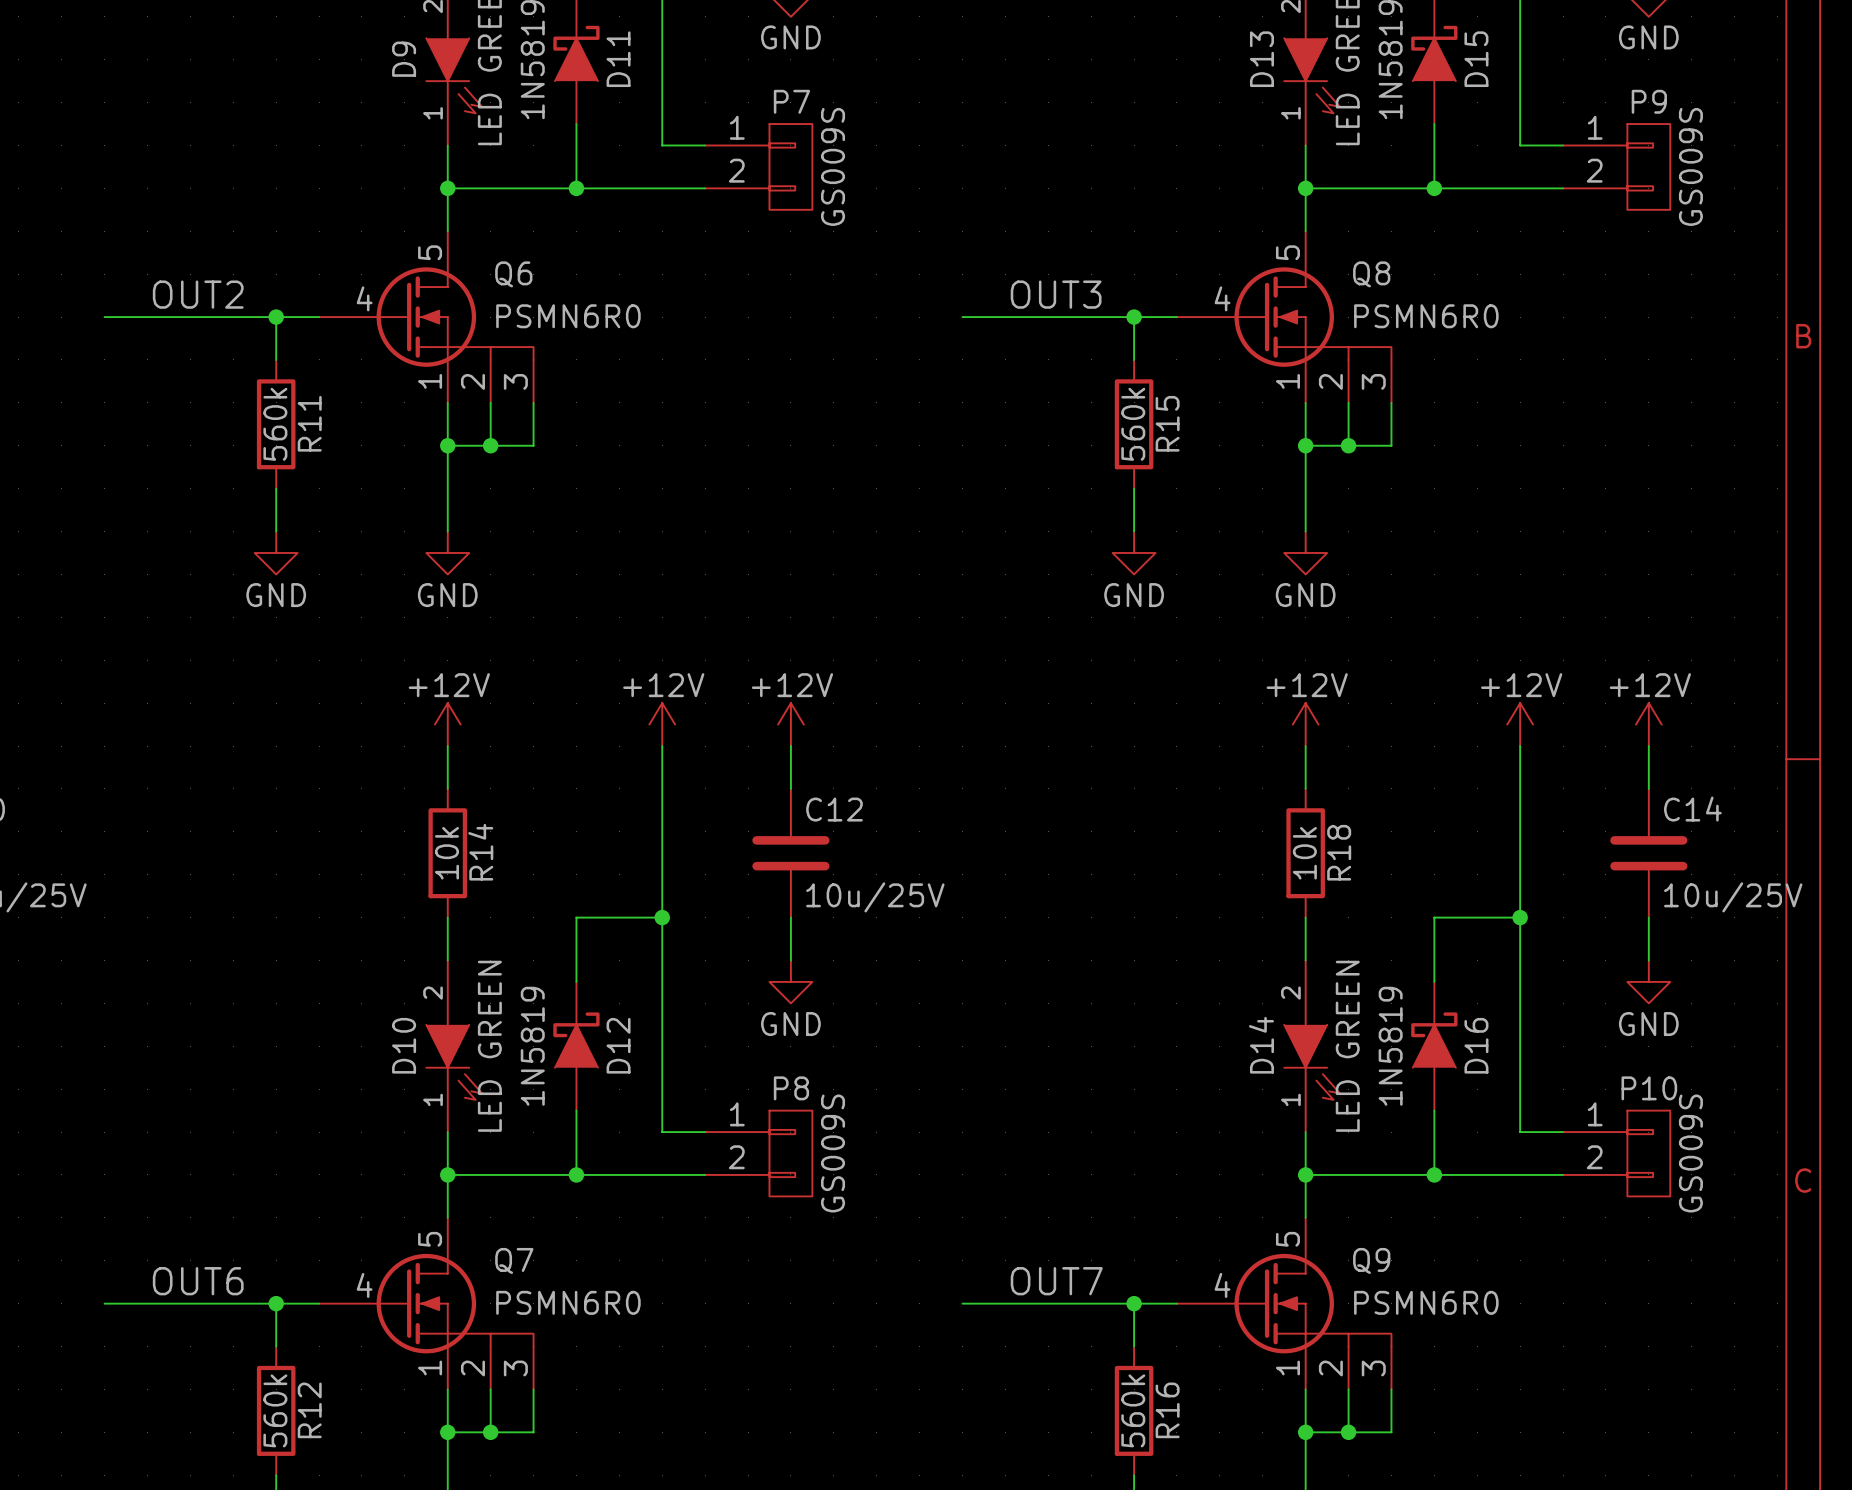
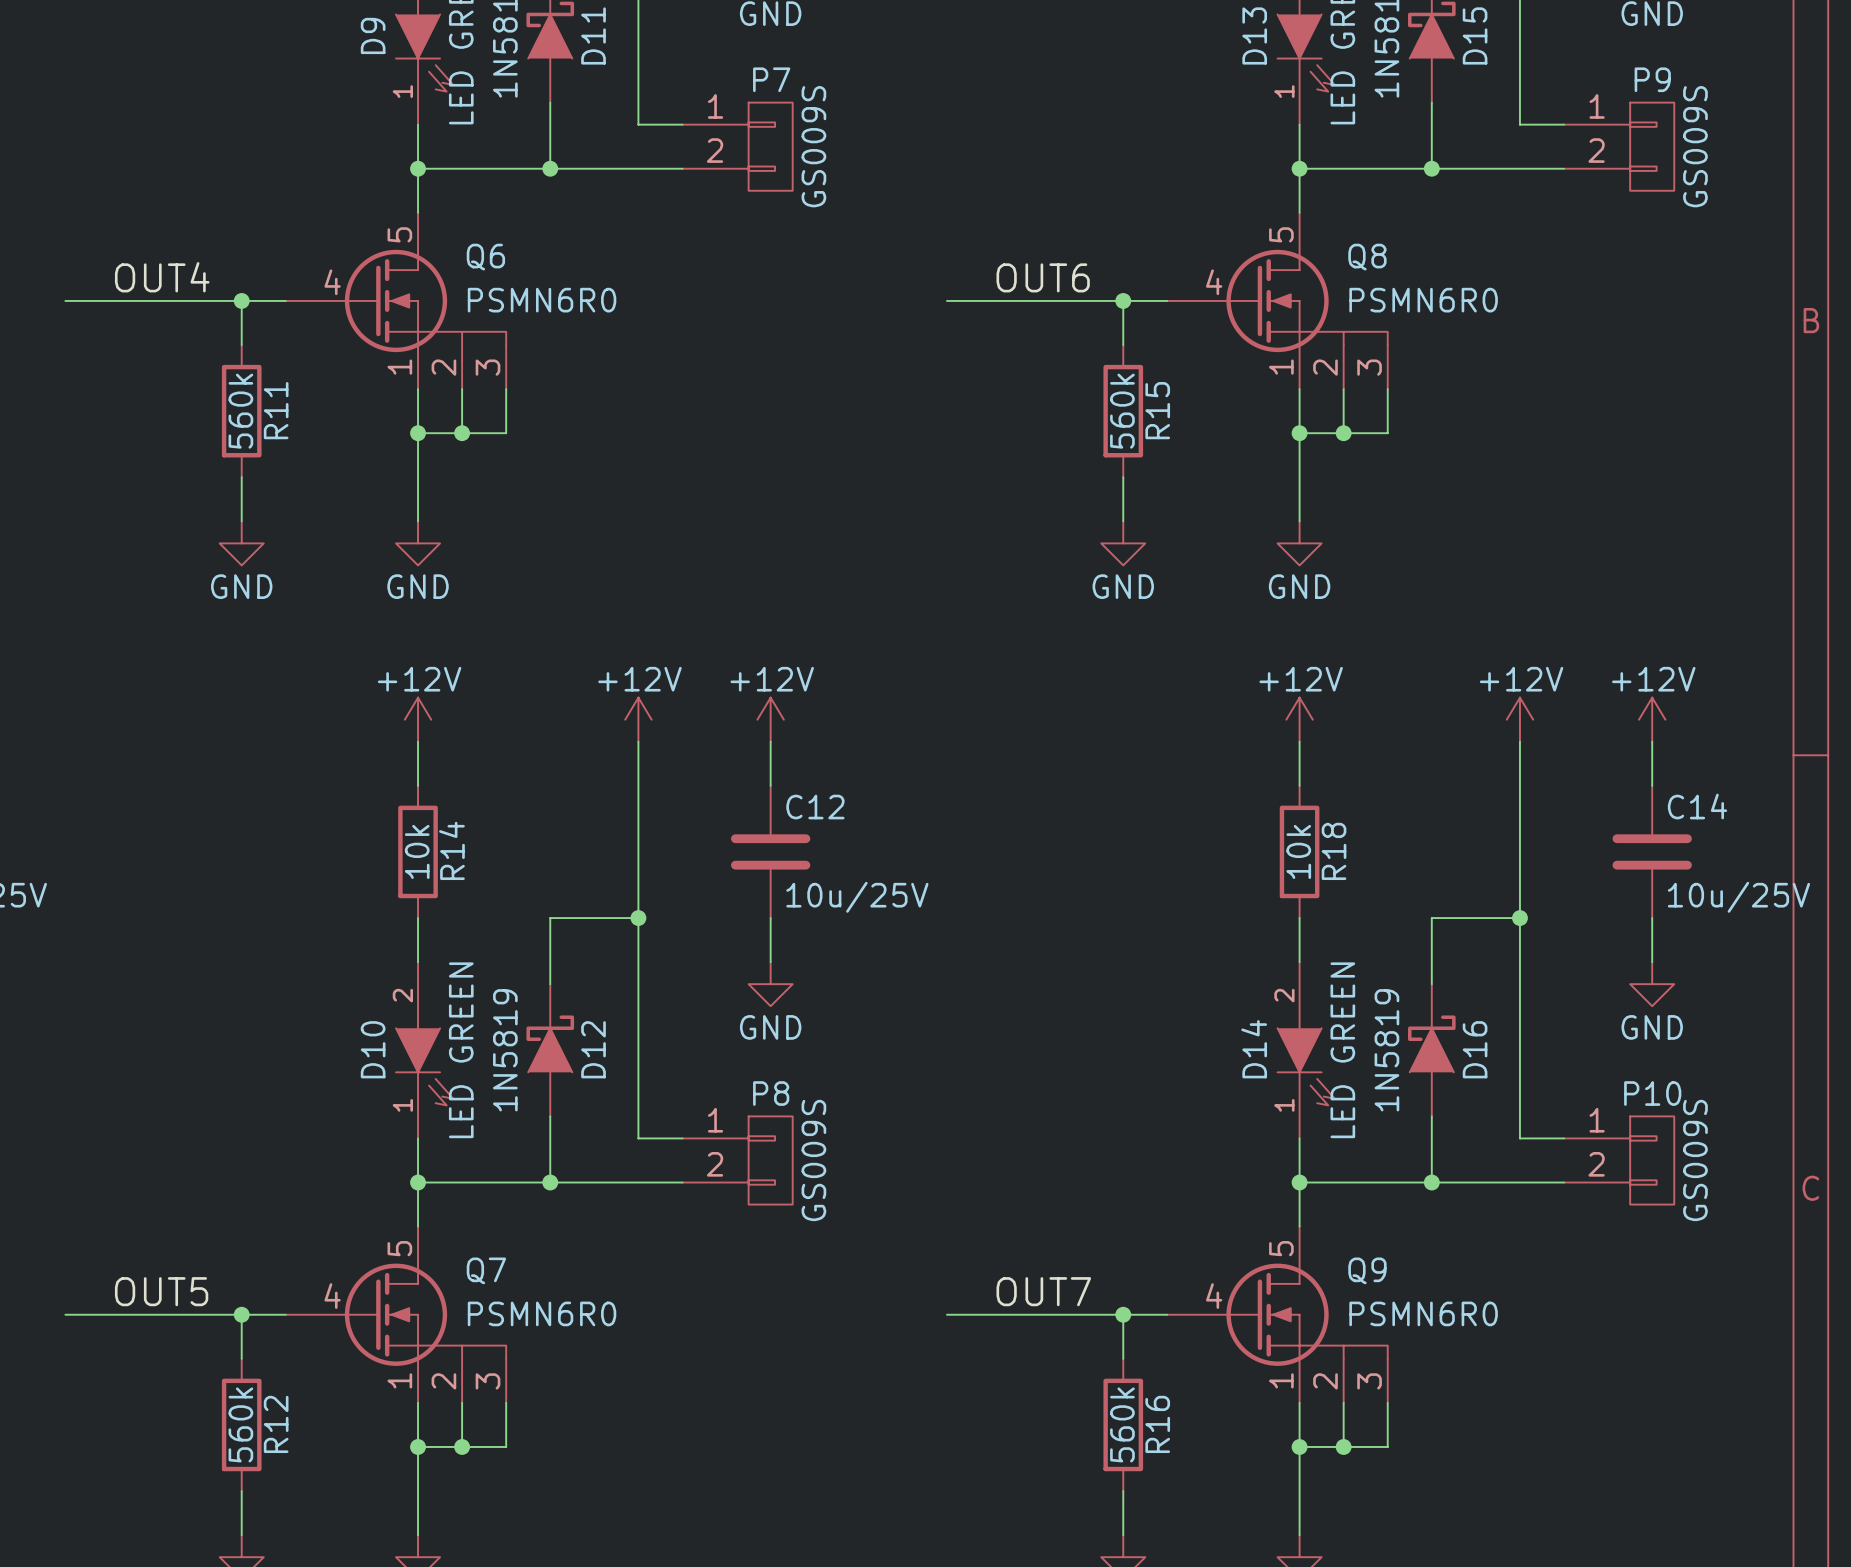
label: OUT2 (198, 294) -> OUT4 (162, 277)
label: OUT3 (1056, 294) -> OUT6 (1043, 277)
label: OUT6 (198, 1281) -> OUT5 (161, 1291)

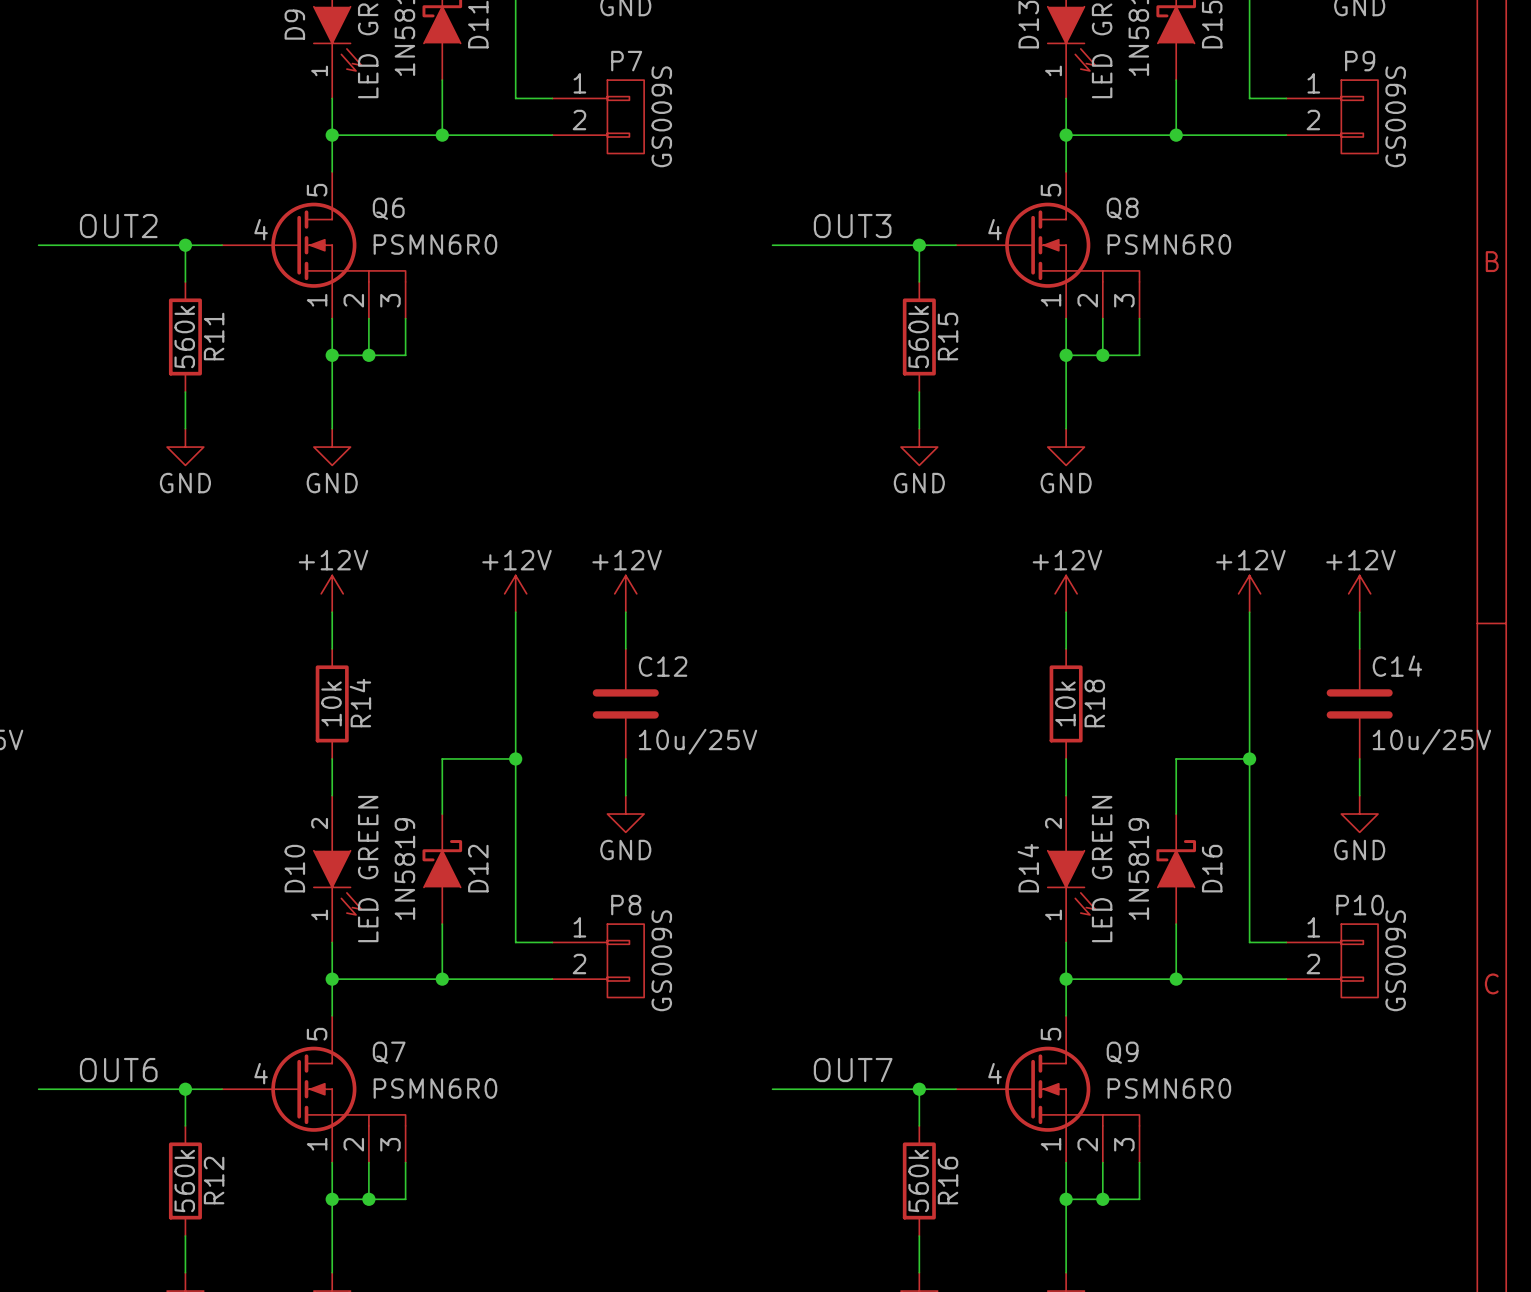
label: OUT4 (162, 277) -> OUT2 (118, 226)
label: OUT6 (1043, 277) -> OUT3 (852, 226)
label: OUT5 (161, 1291) -> OUT6 (118, 1070)

